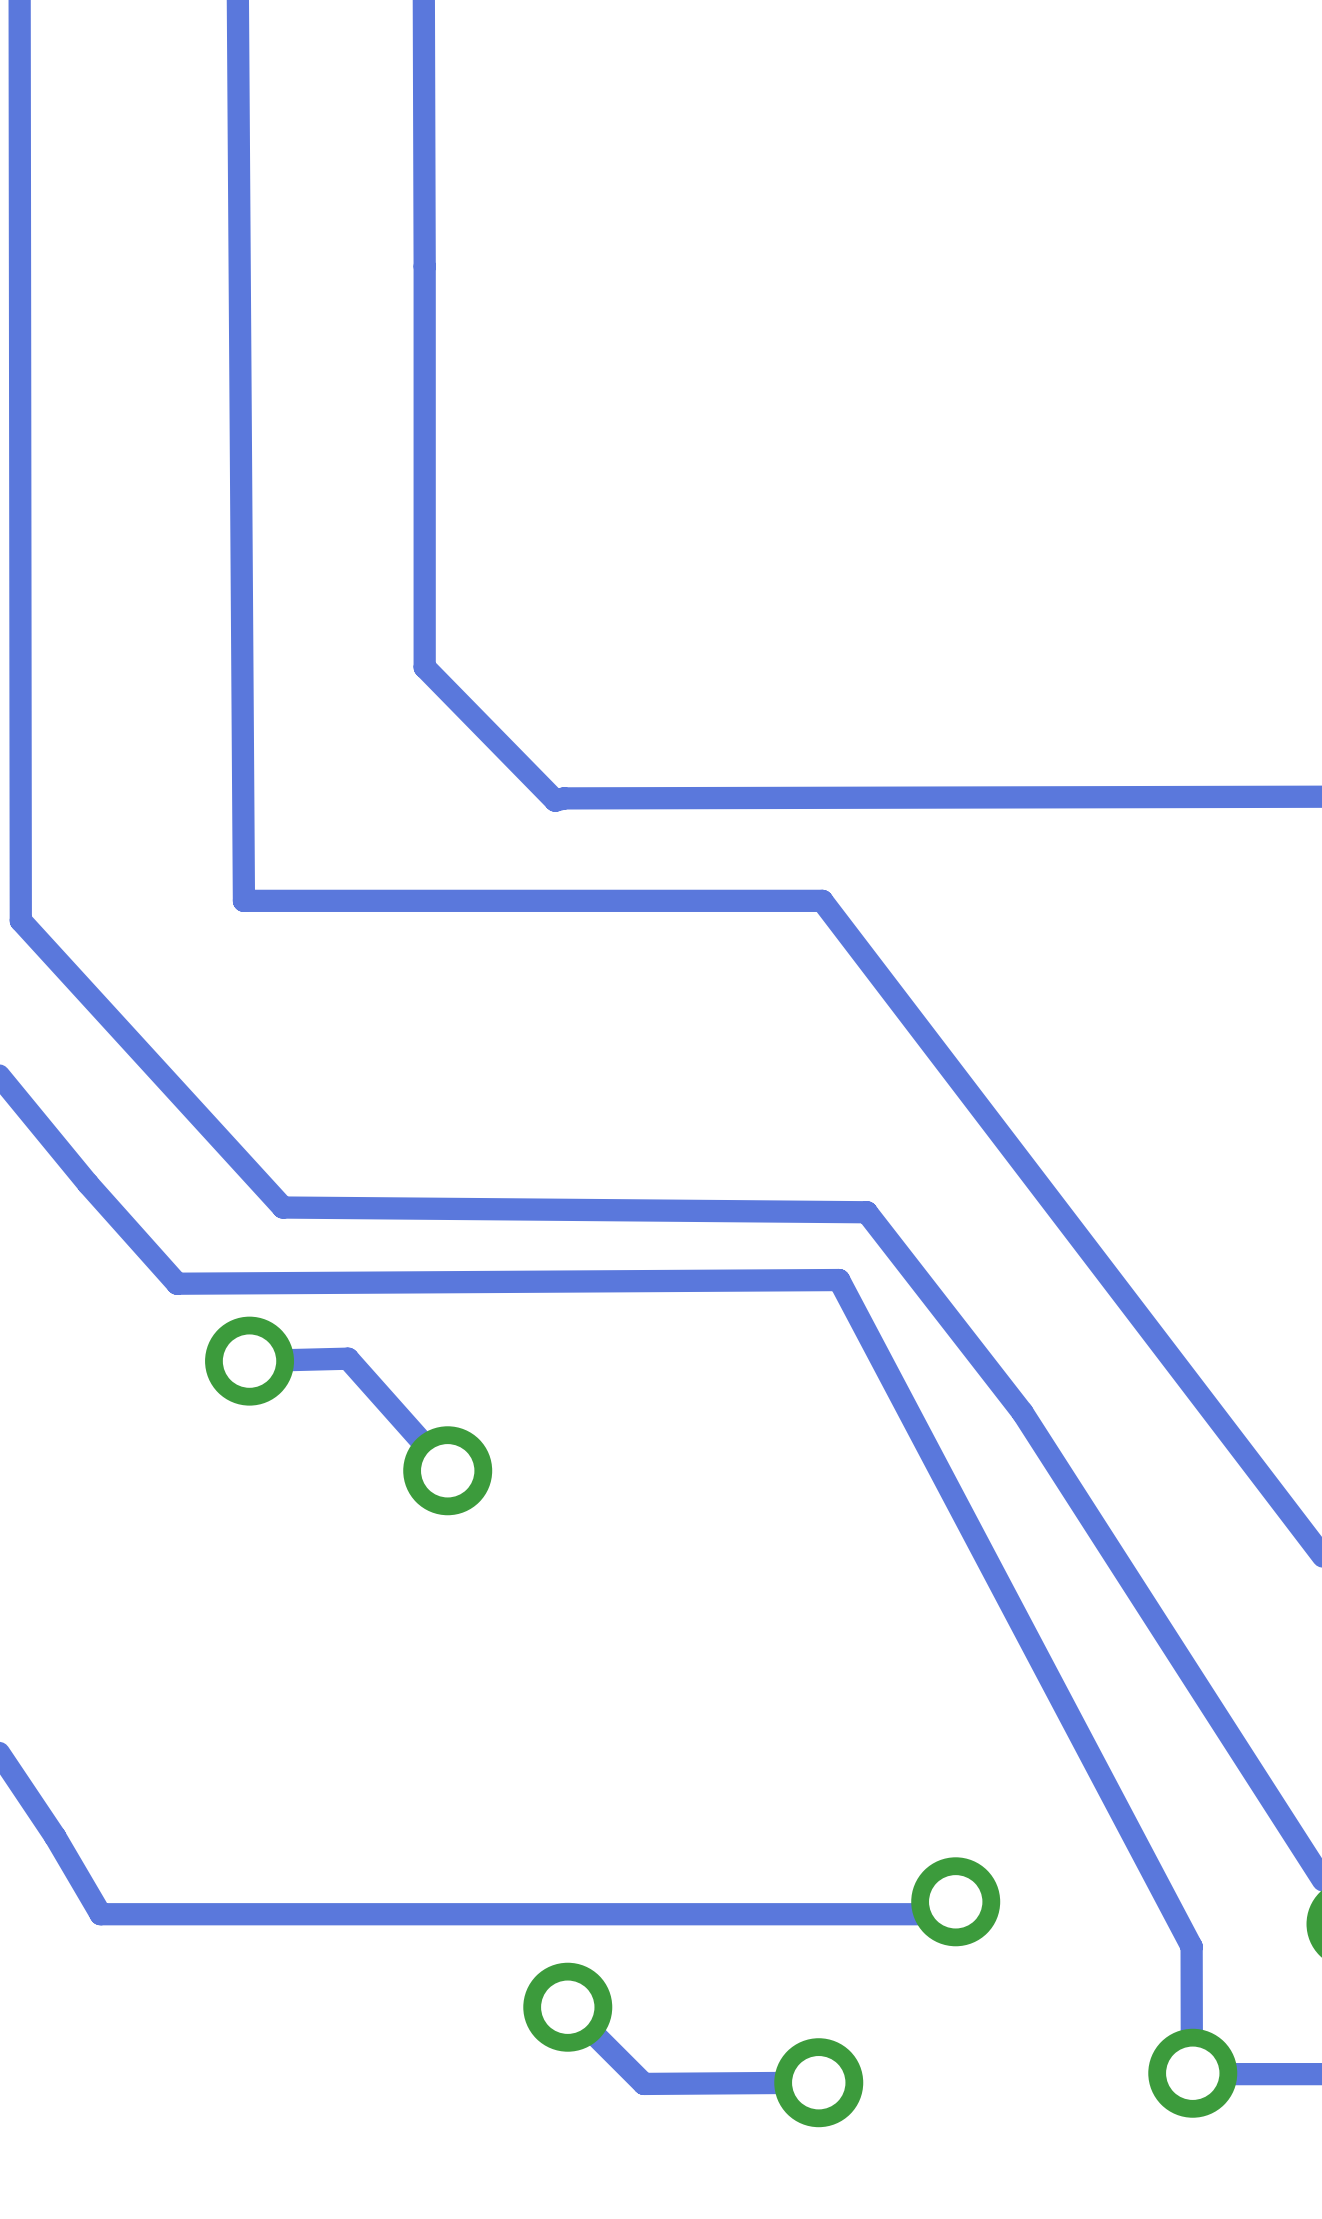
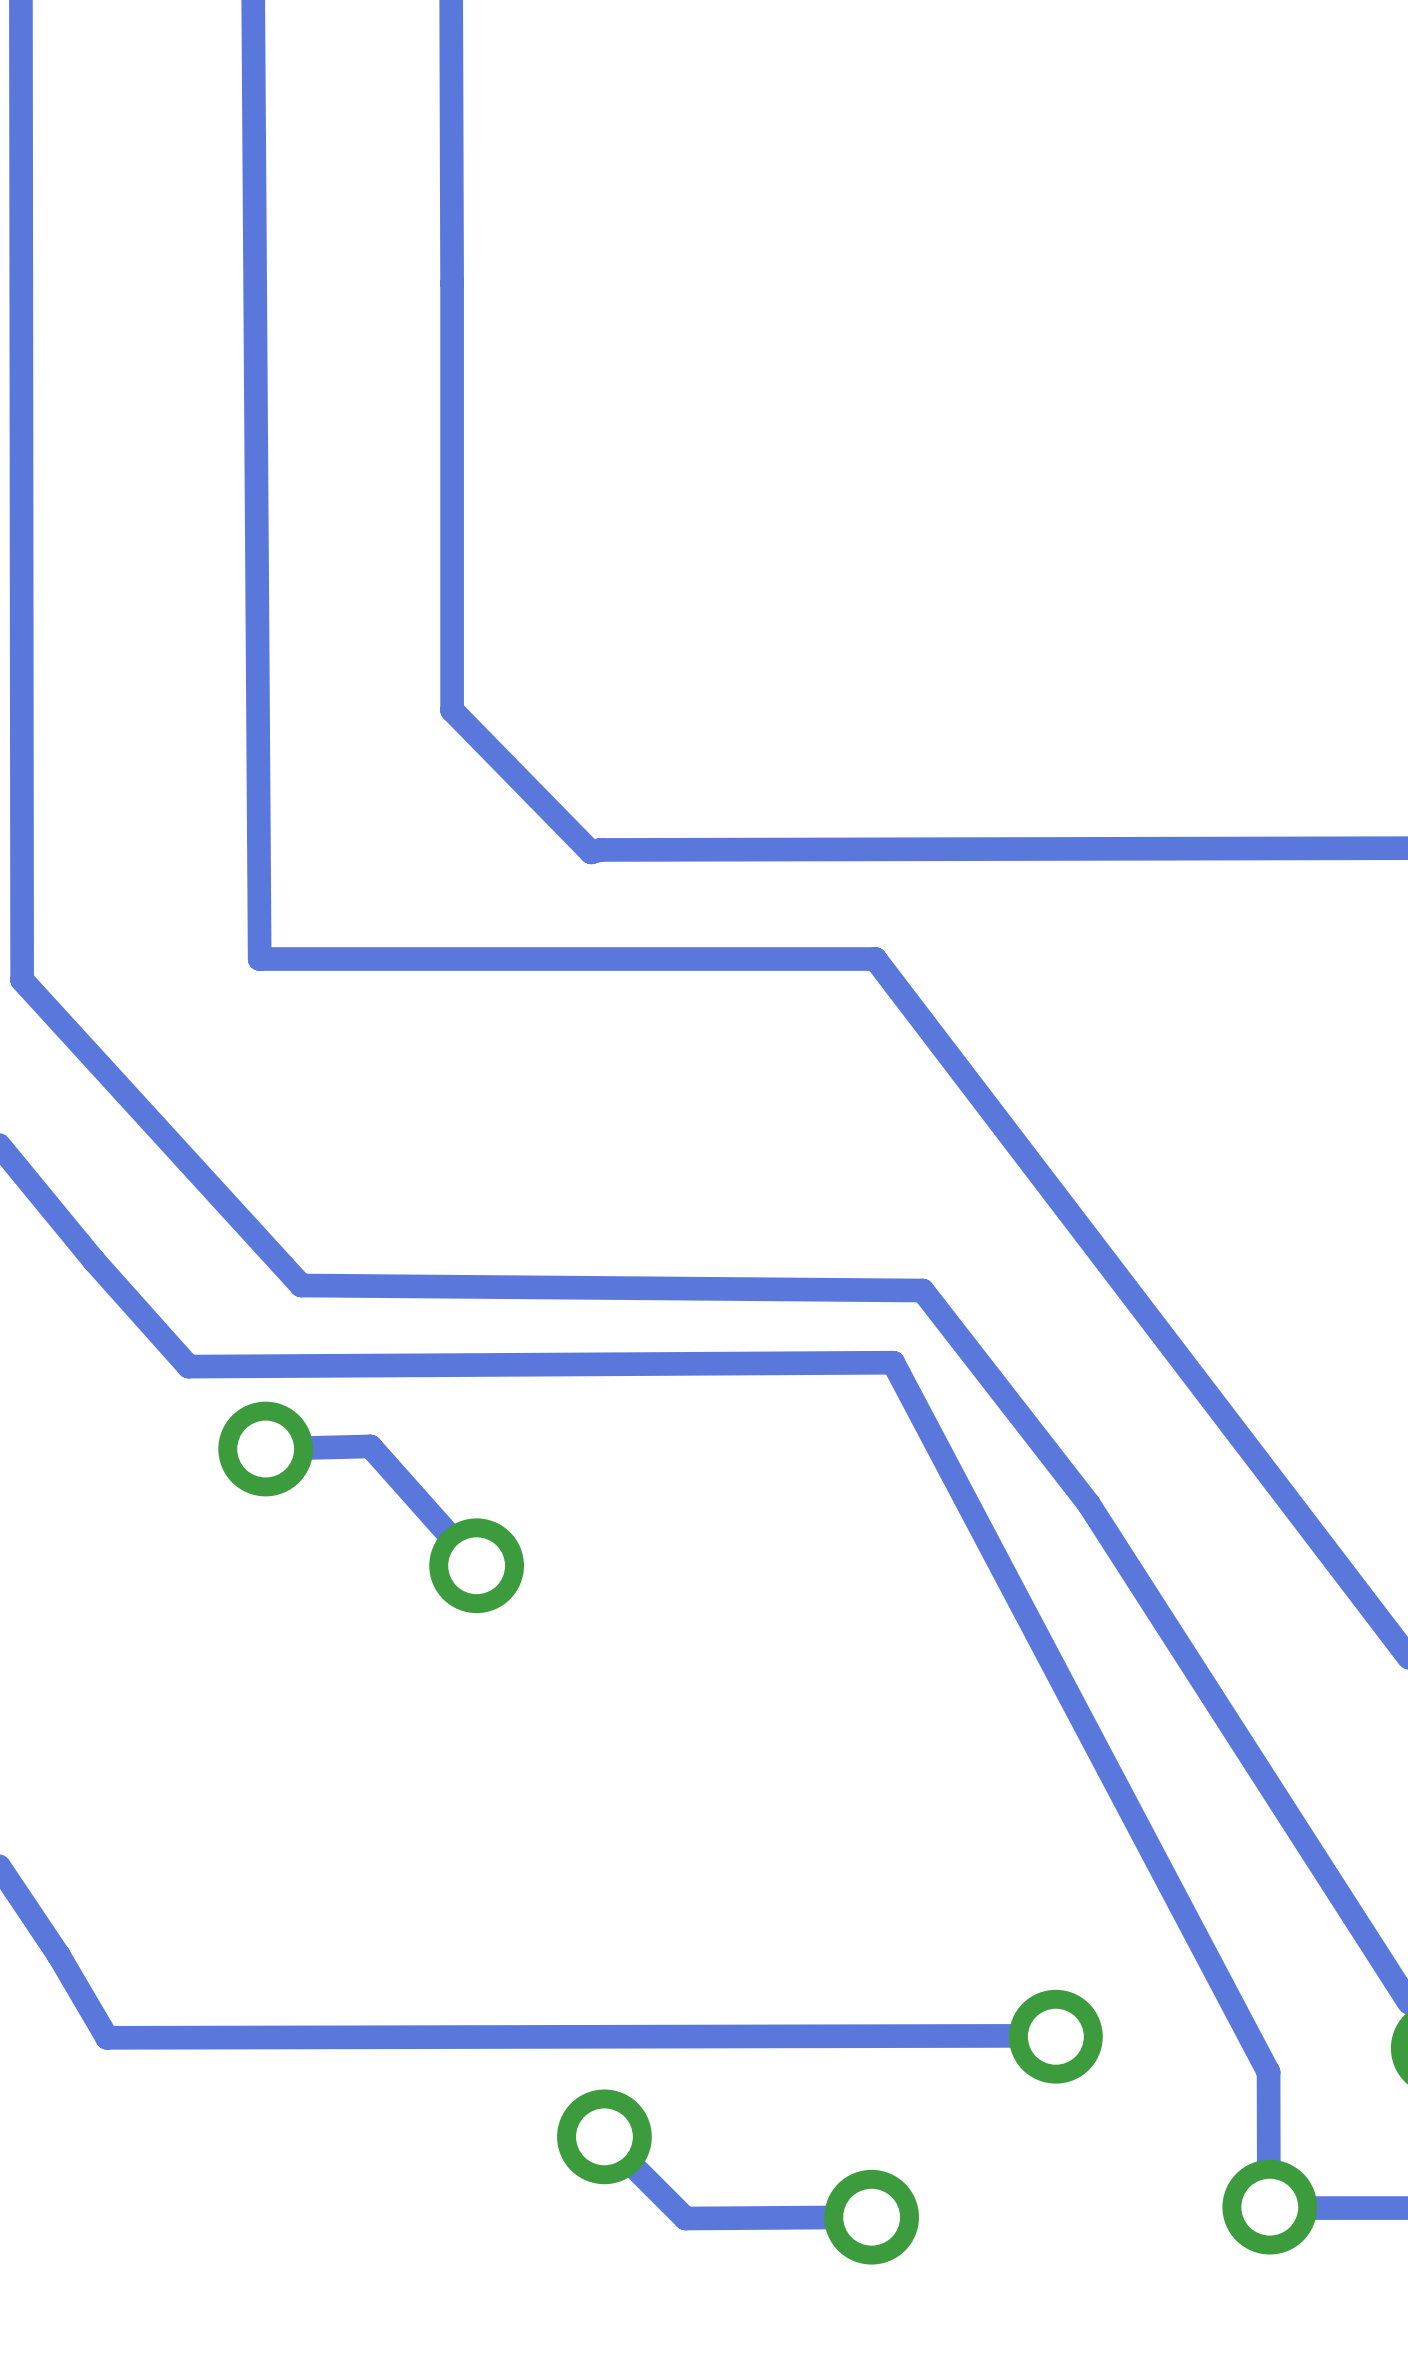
track: (955, 1901) (943, 1914) (100, 1914) -> (1055, 2035) (107, 2037)
via position: (955, 1901) -> (1055, 2036)

